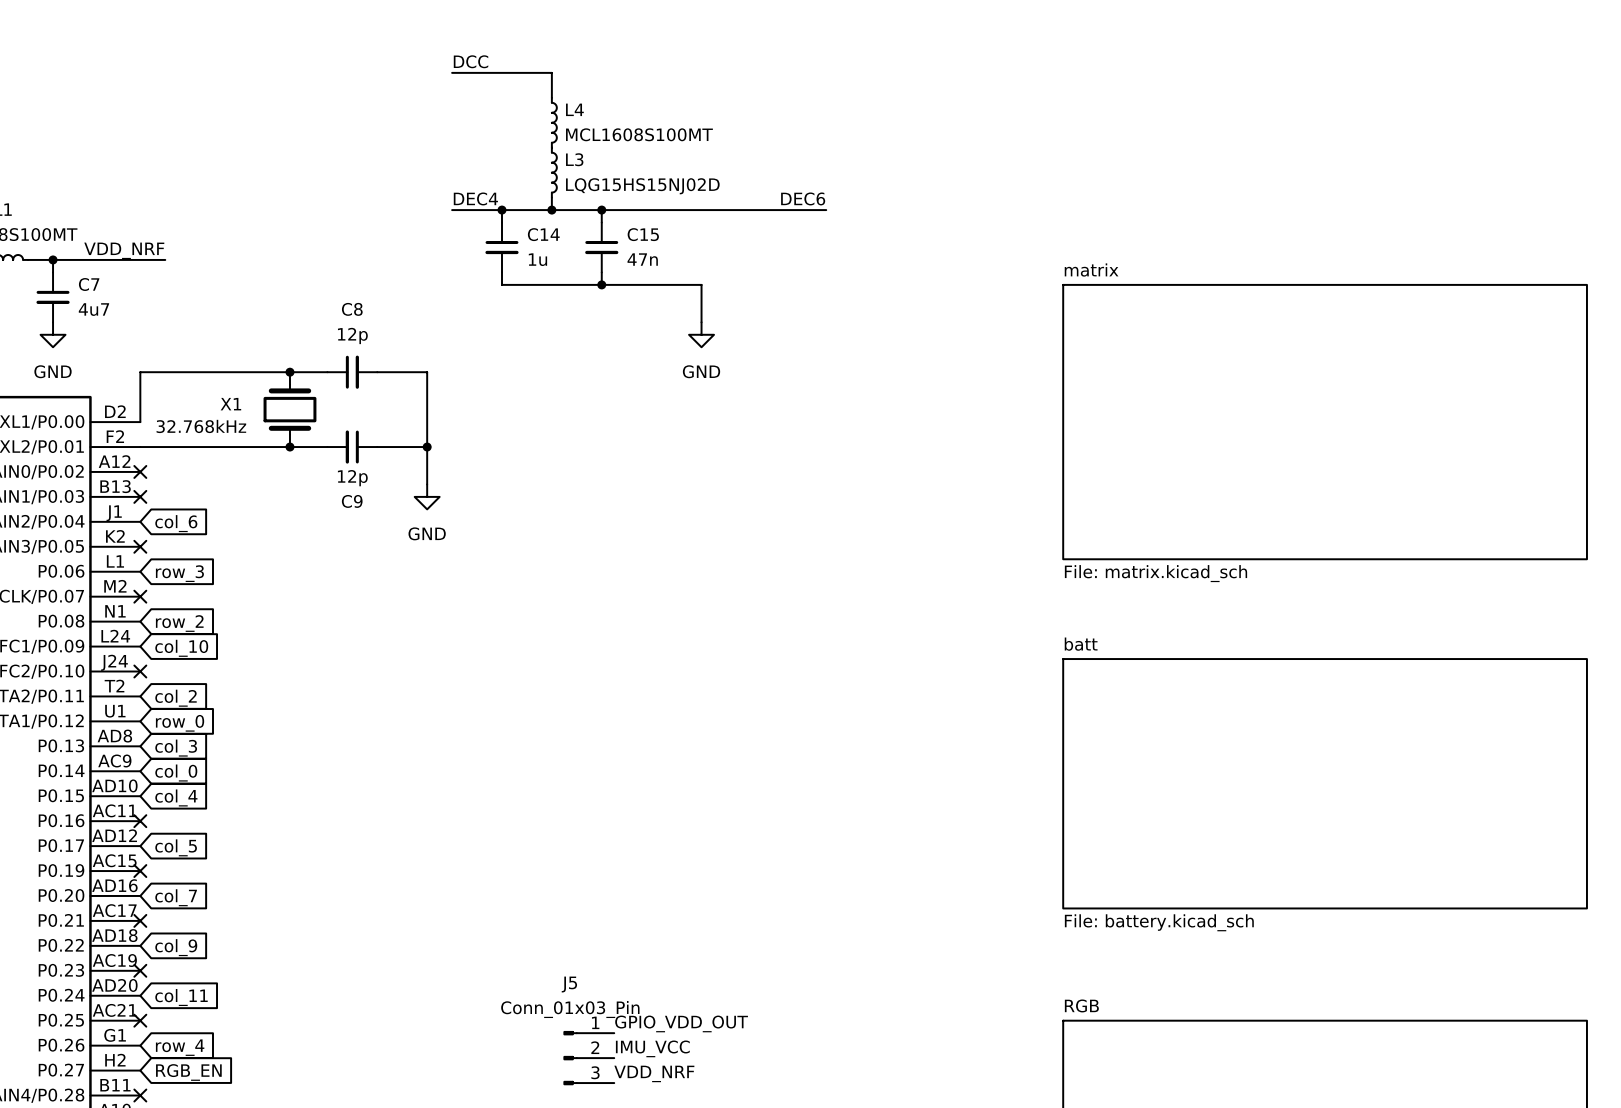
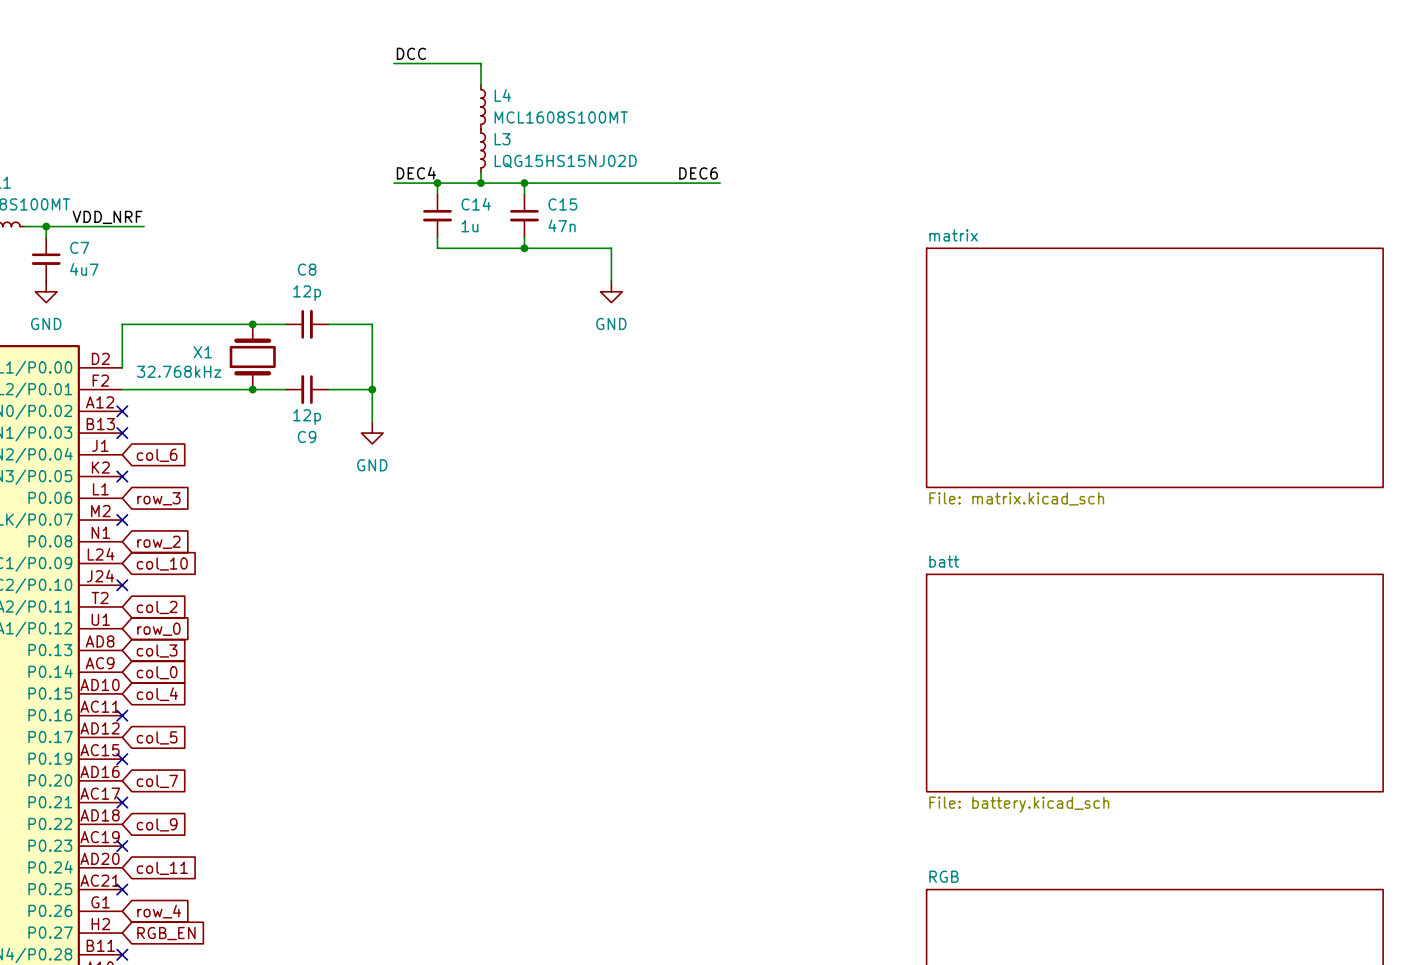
label: GPIO_VDD_OUT (681, 1023) -> none
label: IMU_VCC (652, 1048) -> none
J5: Conn_01x03_Pin (588, 1058) -> none
label: VDD_NRF (654, 1073) -> none

